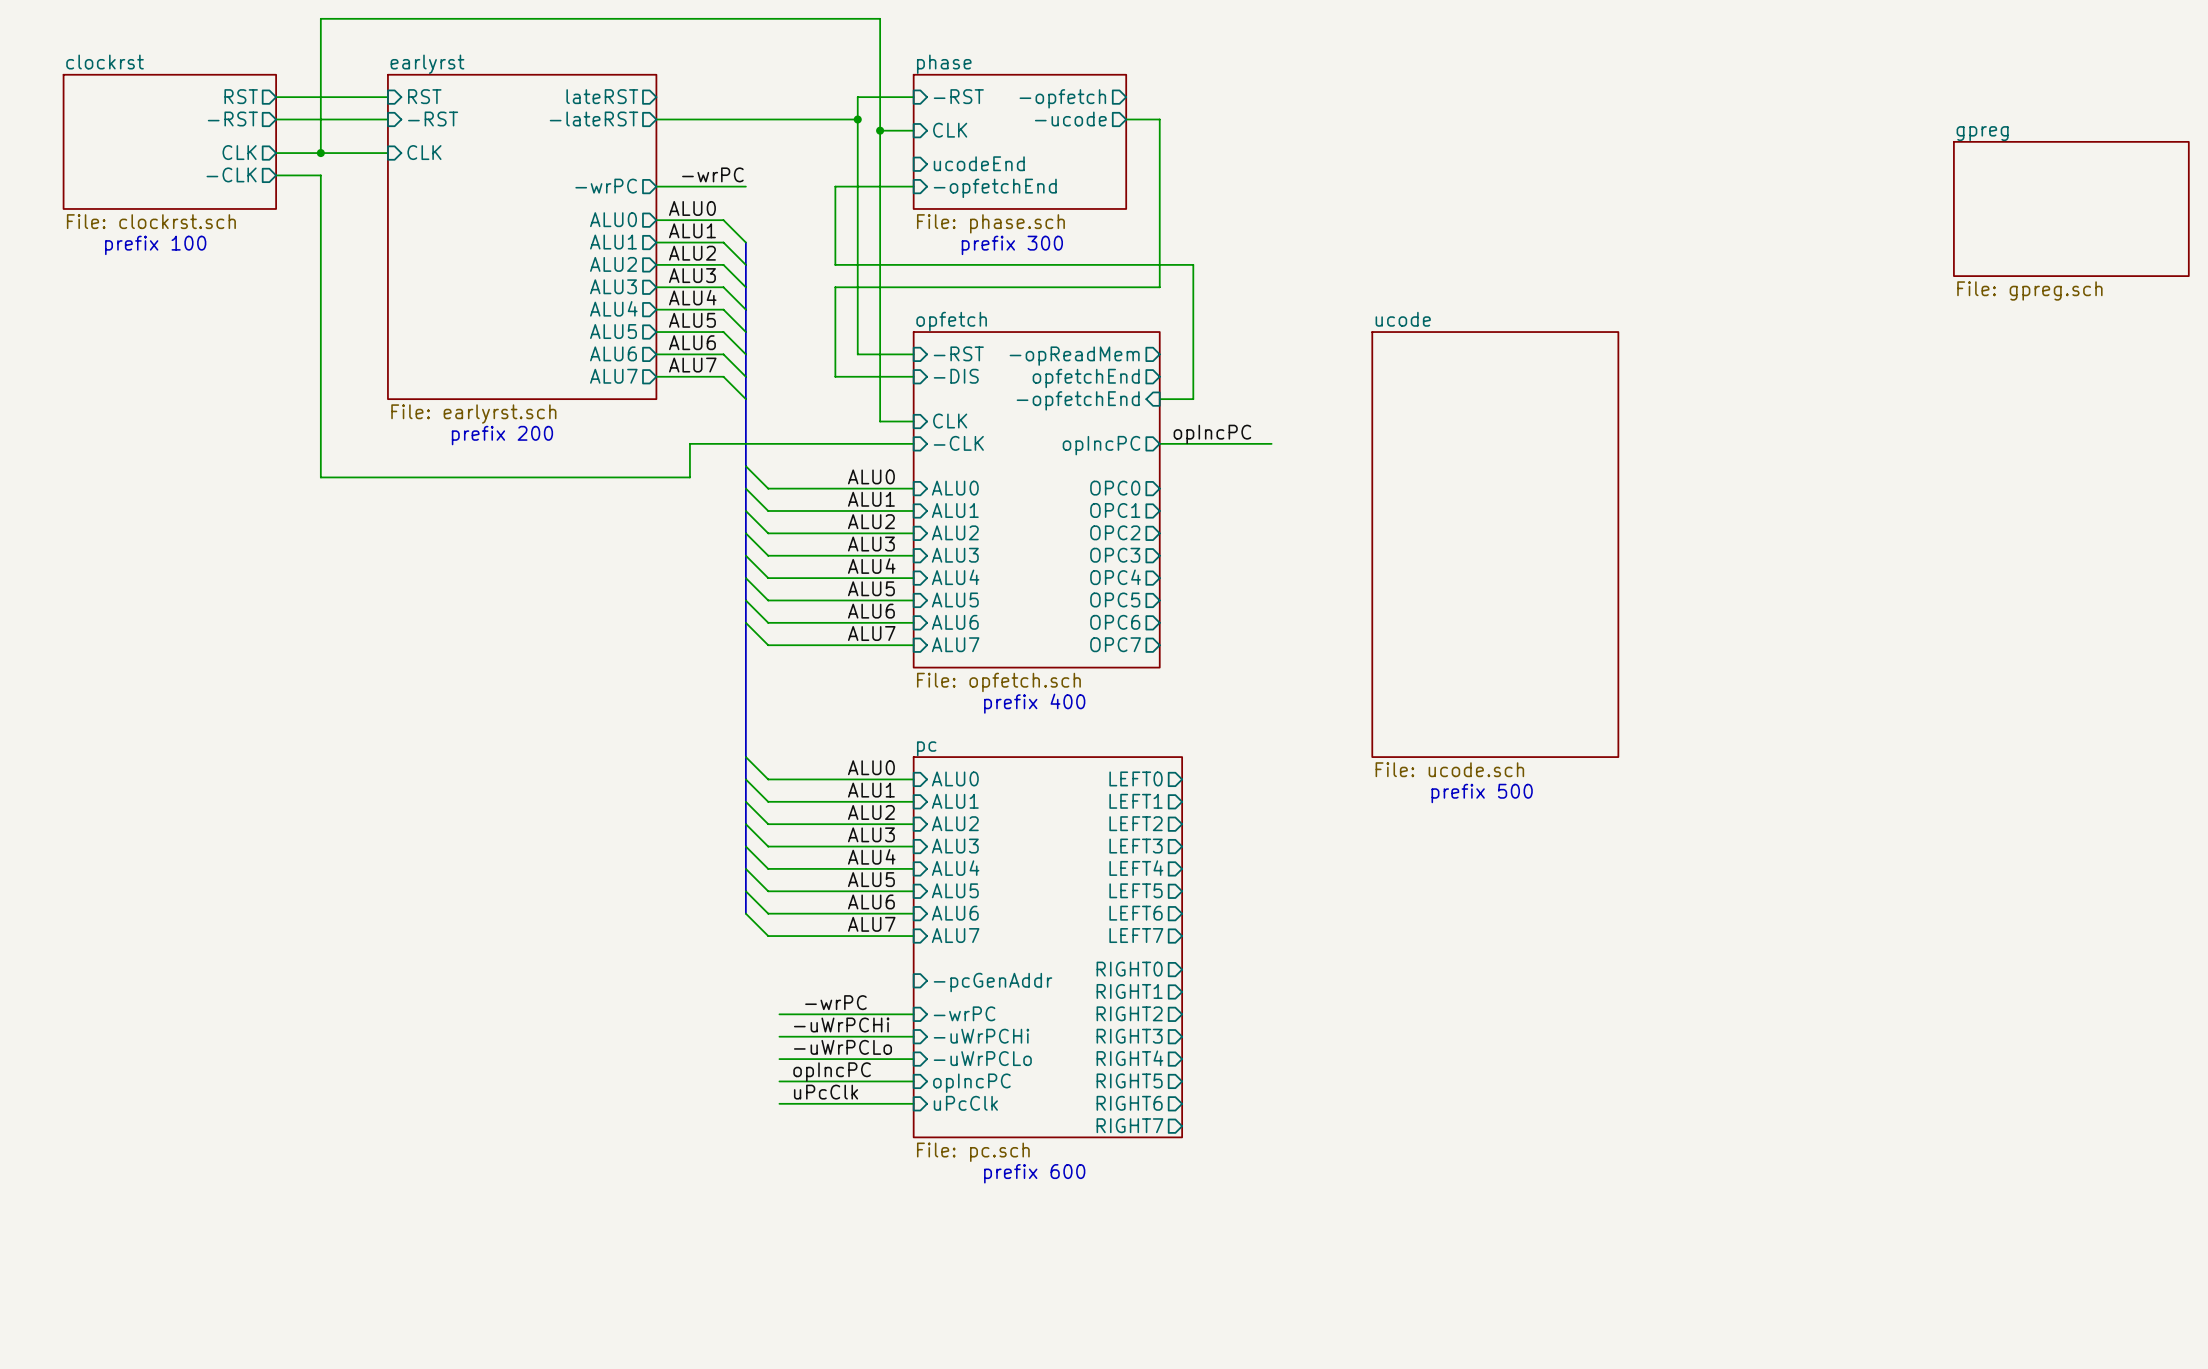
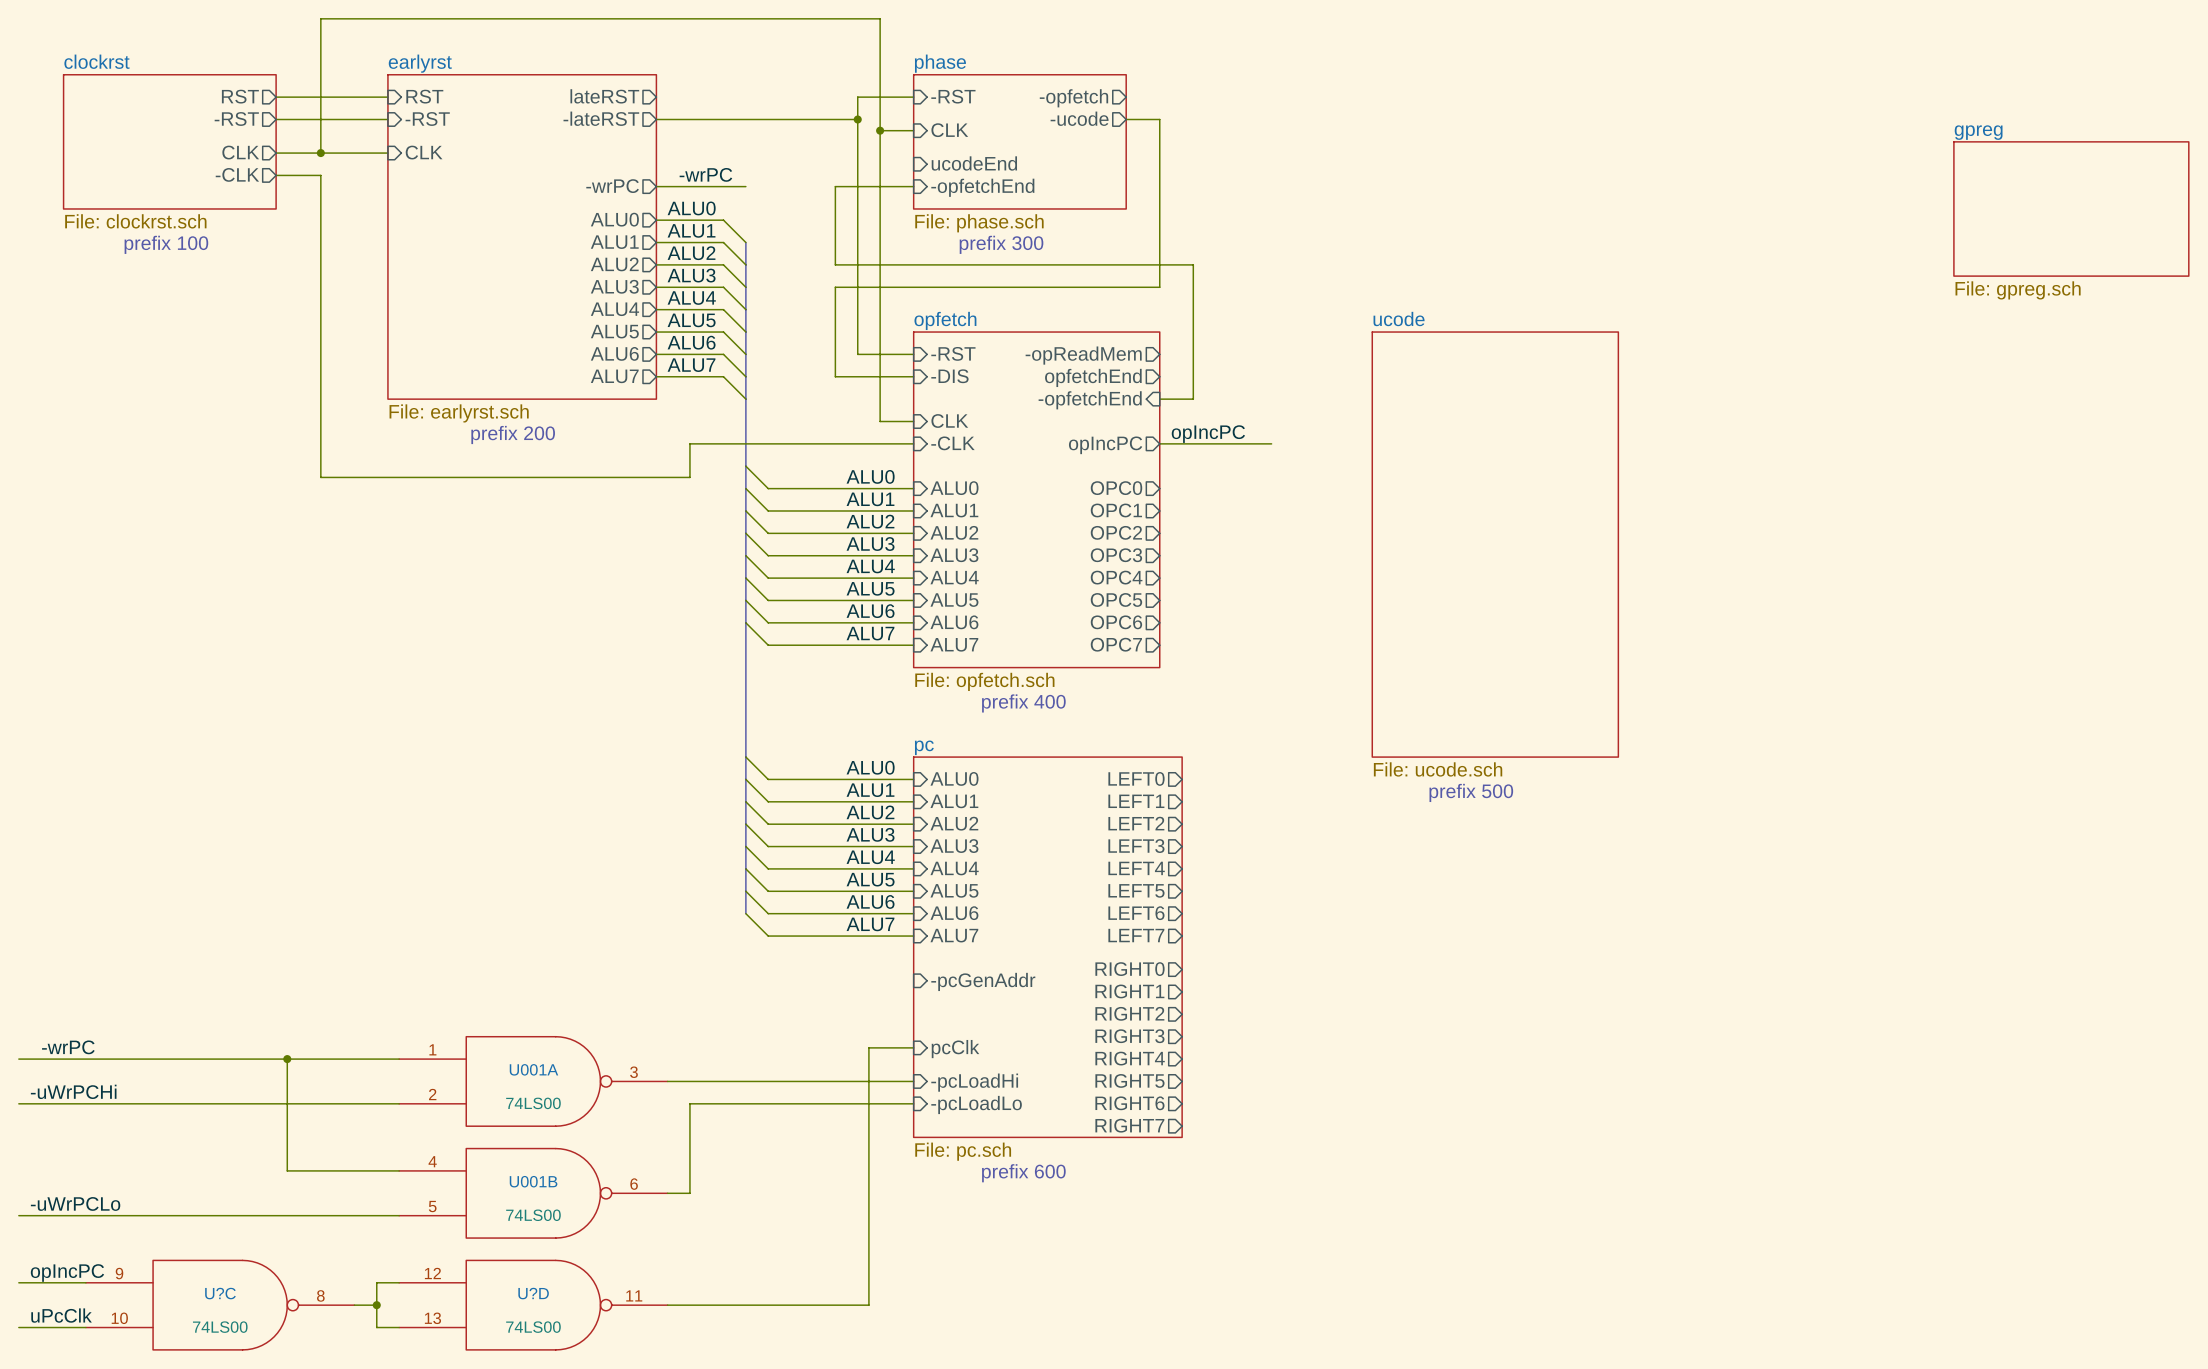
label: -wrPC (835, 1002) -> none
sheet pin: -wrPC (964, 1013) -> none
wire: (779, 1014) (913, 1014) -> none
label: -uWrPCHi (841, 1025) -> none
wire: (779, 1036) (913, 1036) -> none
sheet pin: -uWrPCHi (981, 1036) -> none
label: none -> -wrPC (68, 1047)
label: -uWrPCLo (842, 1047) -> none
wire: none -> (913, 1047) (868, 1047) (868, 1305) (667, 1305)
sheet pin: none -> pcClk (955, 1049)
sheet pin: -uWrPCLo (982, 1058) -> none
wire: none -> (18, 1059) (399, 1059)
wire: none -> (287, 1059) (287, 1170) (399, 1170)
junction: none -> (287, 1059)
wire: (779, 1059) (913, 1059) -> none
label: opIncPC (832, 1071) -> none
U001A: none -> 74LS00 (533, 1081)
wire: none -> (667, 1081) (779, 1081)
sheet pin: opIncPC (971, 1083) -> -pcLoadHi (974, 1082)
label: none -> -uWrPCHi (73, 1091)
label: uPcClk (826, 1092) -> none
wire: none -> (18, 1103) (399, 1103)
wire: none -> (779, 1103) (689, 1103) (689, 1193) (667, 1193)
sheet pin: uPcClk (965, 1103) -> -pcLoadLo (976, 1104)
U001B: none -> 74LS00 (533, 1193)
label: none -> -uWrPCLo (75, 1203)
wire: none -> (18, 1215) (399, 1215)
label: none -> opIncPC (67, 1273)
wire: none -> (18, 1282) (85, 1282)
wire: none -> (399, 1282) (376, 1282) (376, 1327) (399, 1327)
U?C: none -> 74LS00 (220, 1305)
wire: none -> (354, 1305) (376, 1305)
junction: none -> (376, 1305)
U?D: none -> 74LS00 (533, 1305)
label: none -> uPcClk (61, 1315)
wire: none -> (18, 1327) (85, 1327)

